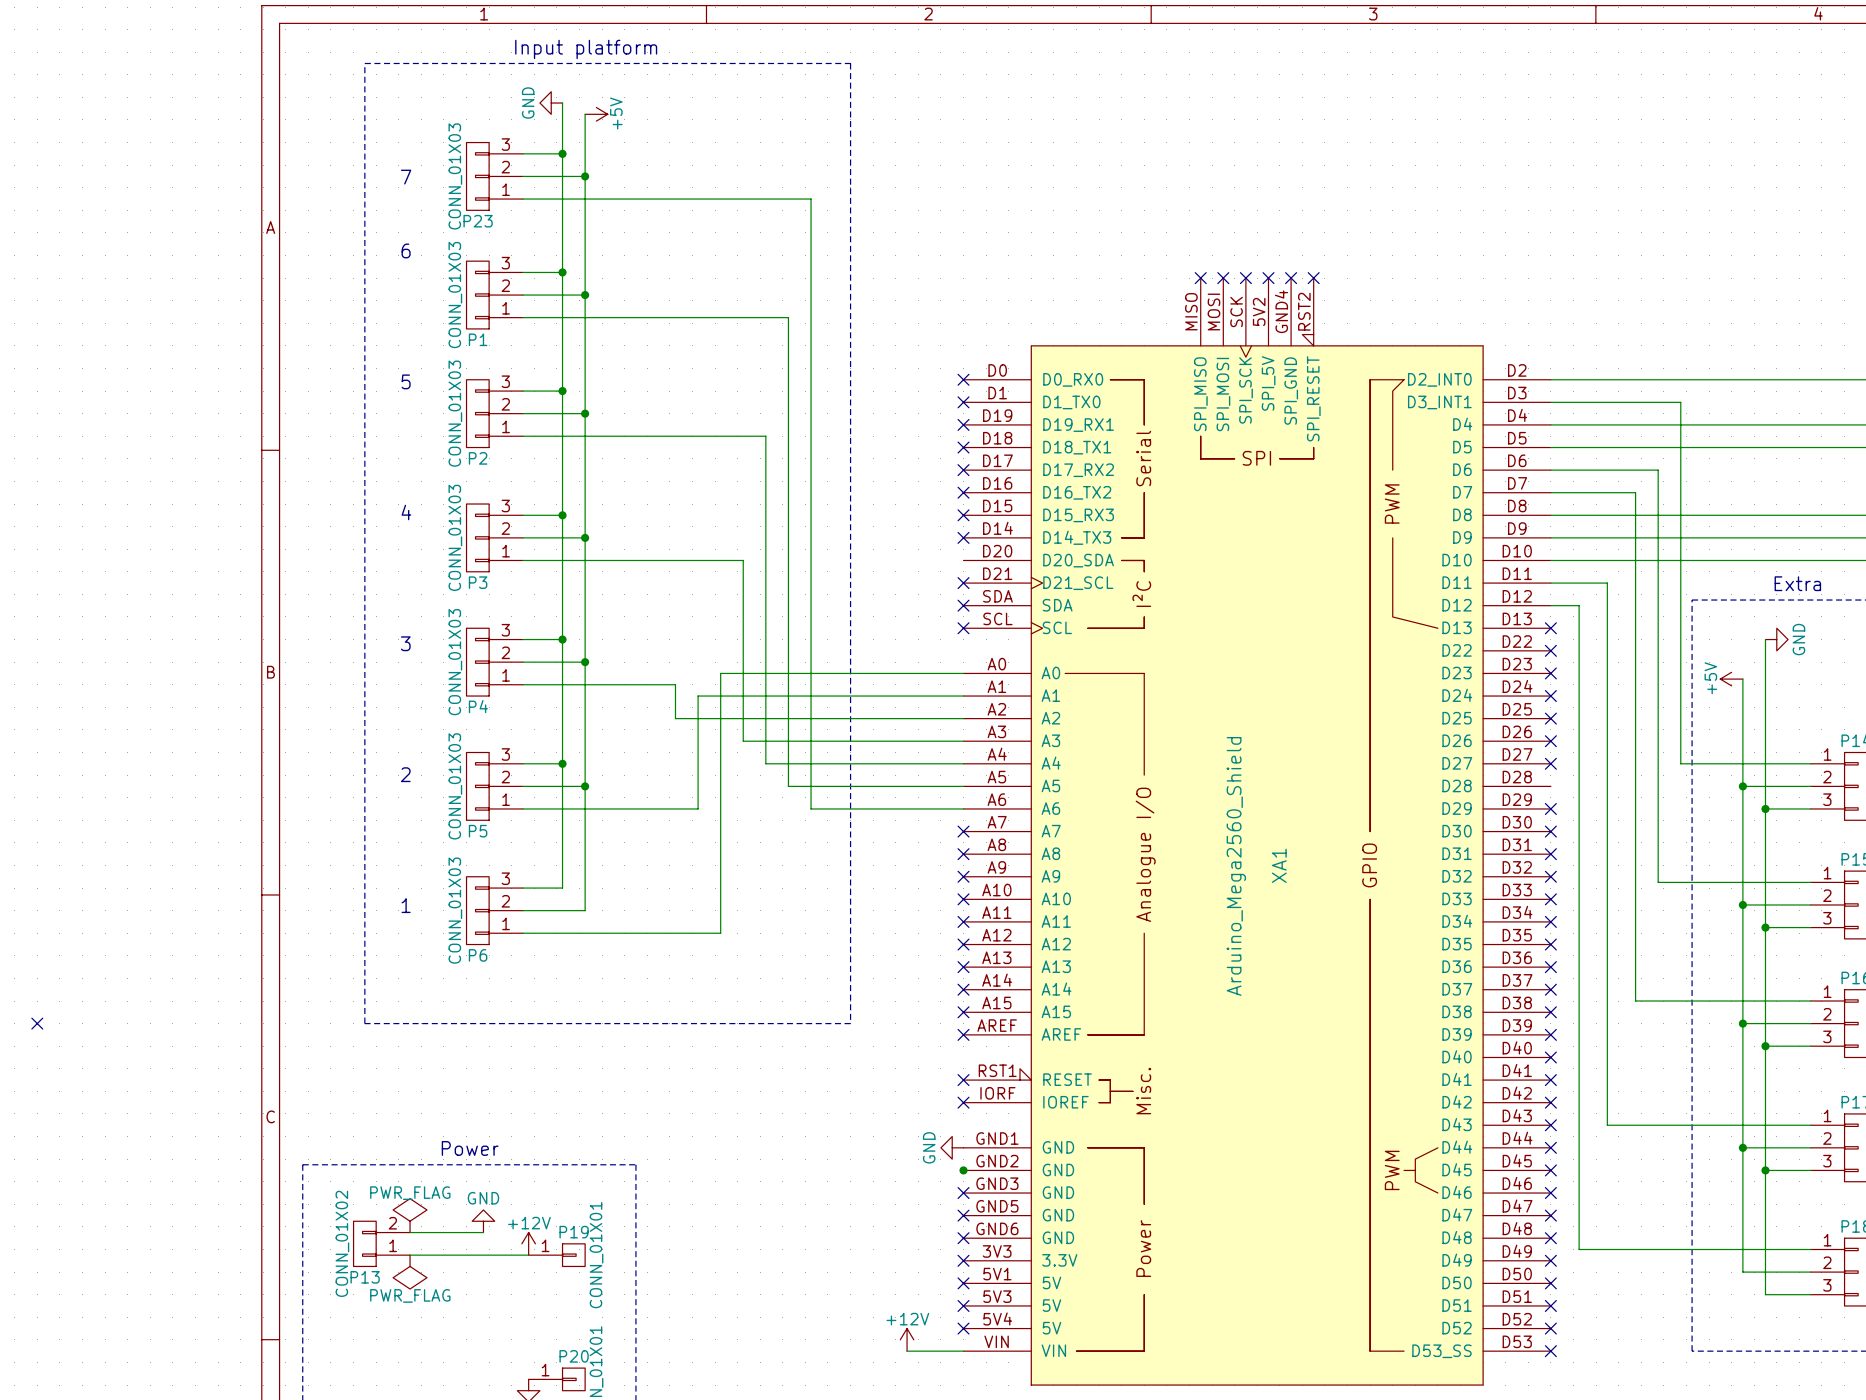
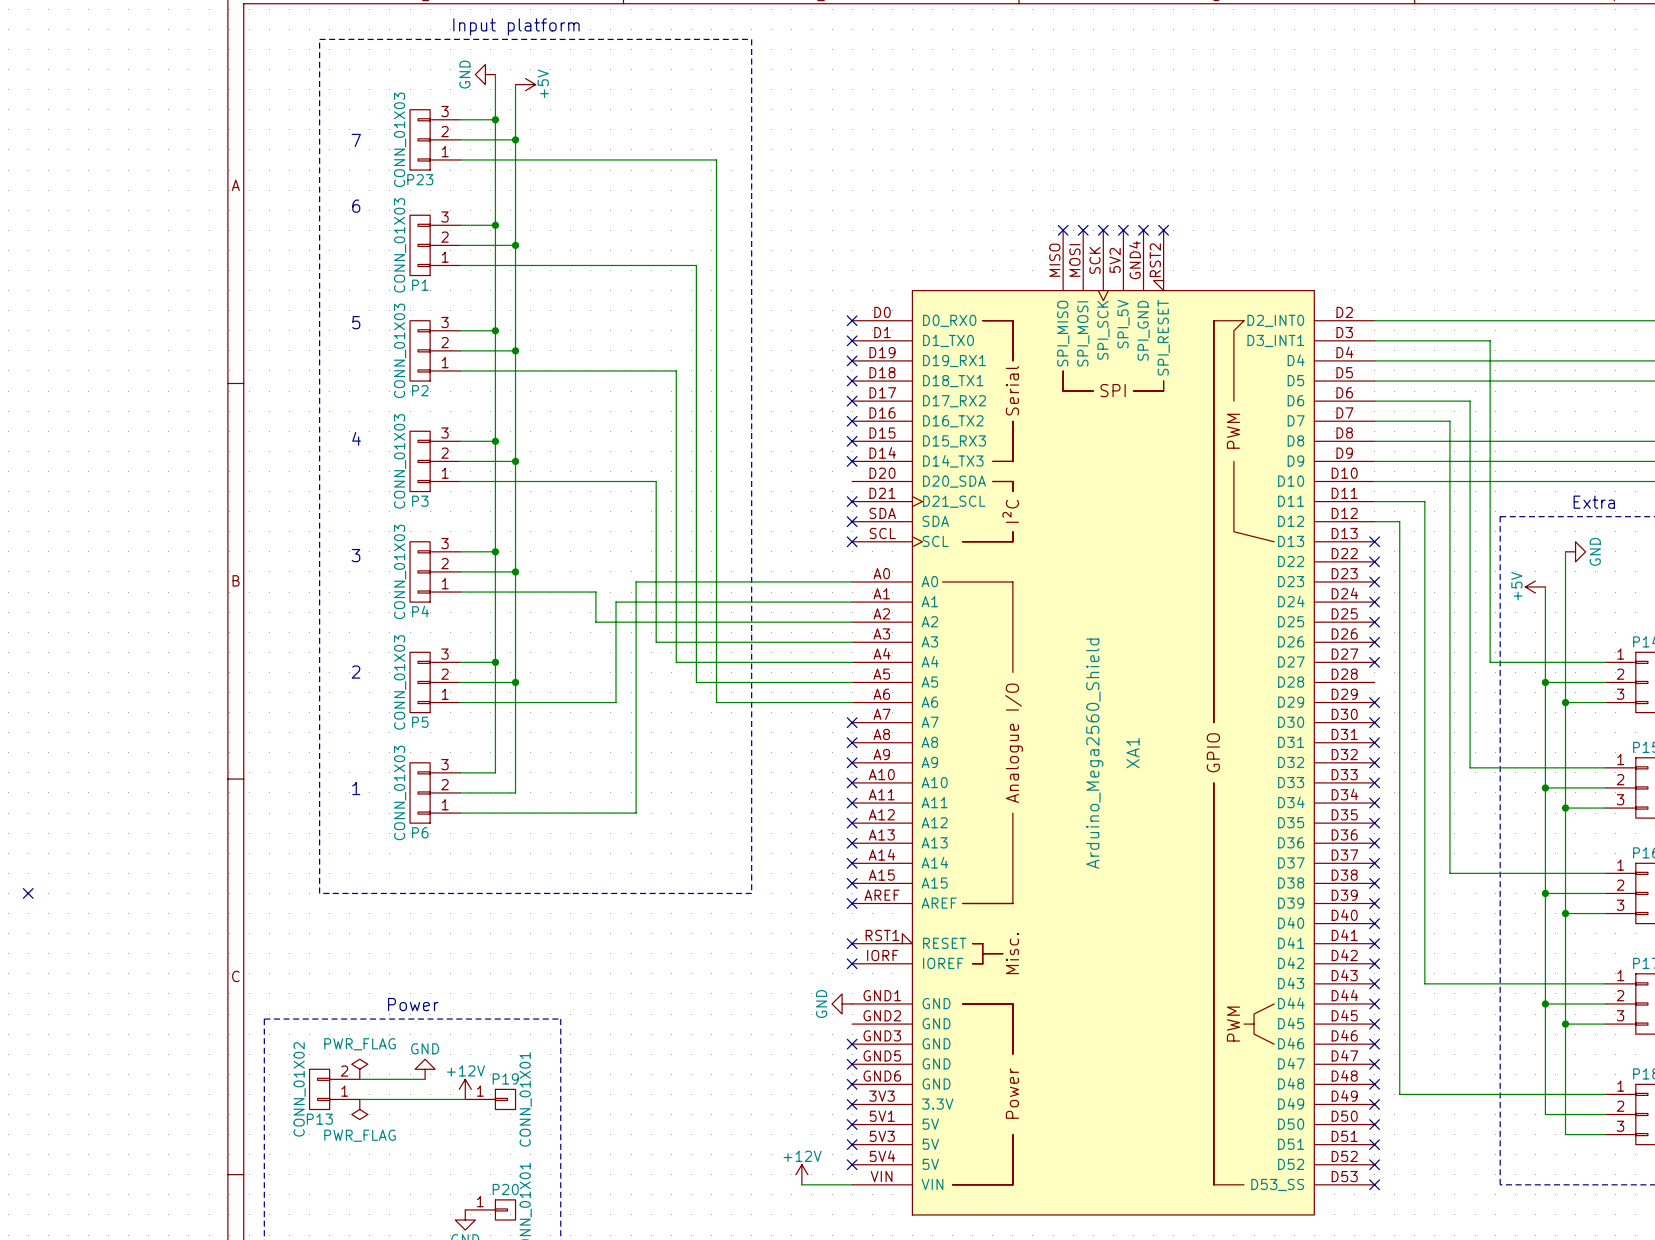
junction: (963, 1170) -> none
power symbol shape: [393, 1198, 427, 1233] -> [351, 1059, 368, 1080]
power symbol shape: [393, 1255, 427, 1290] -> [351, 1099, 368, 1120]

